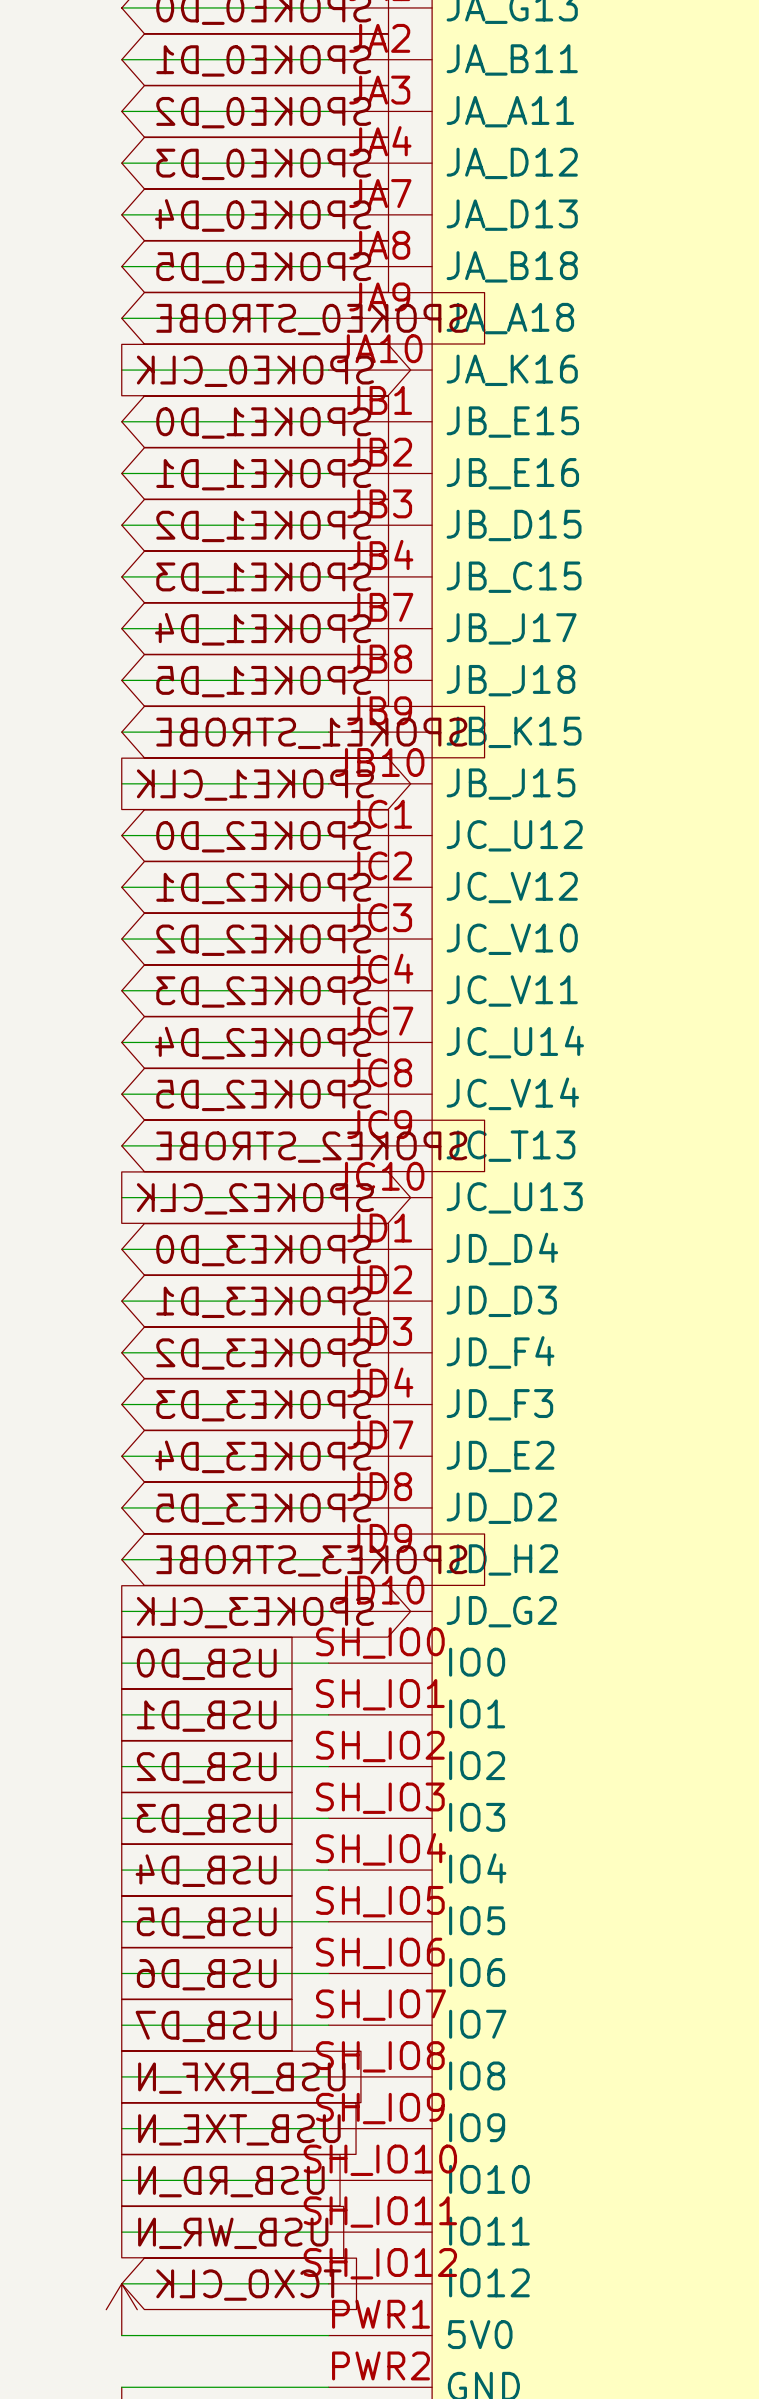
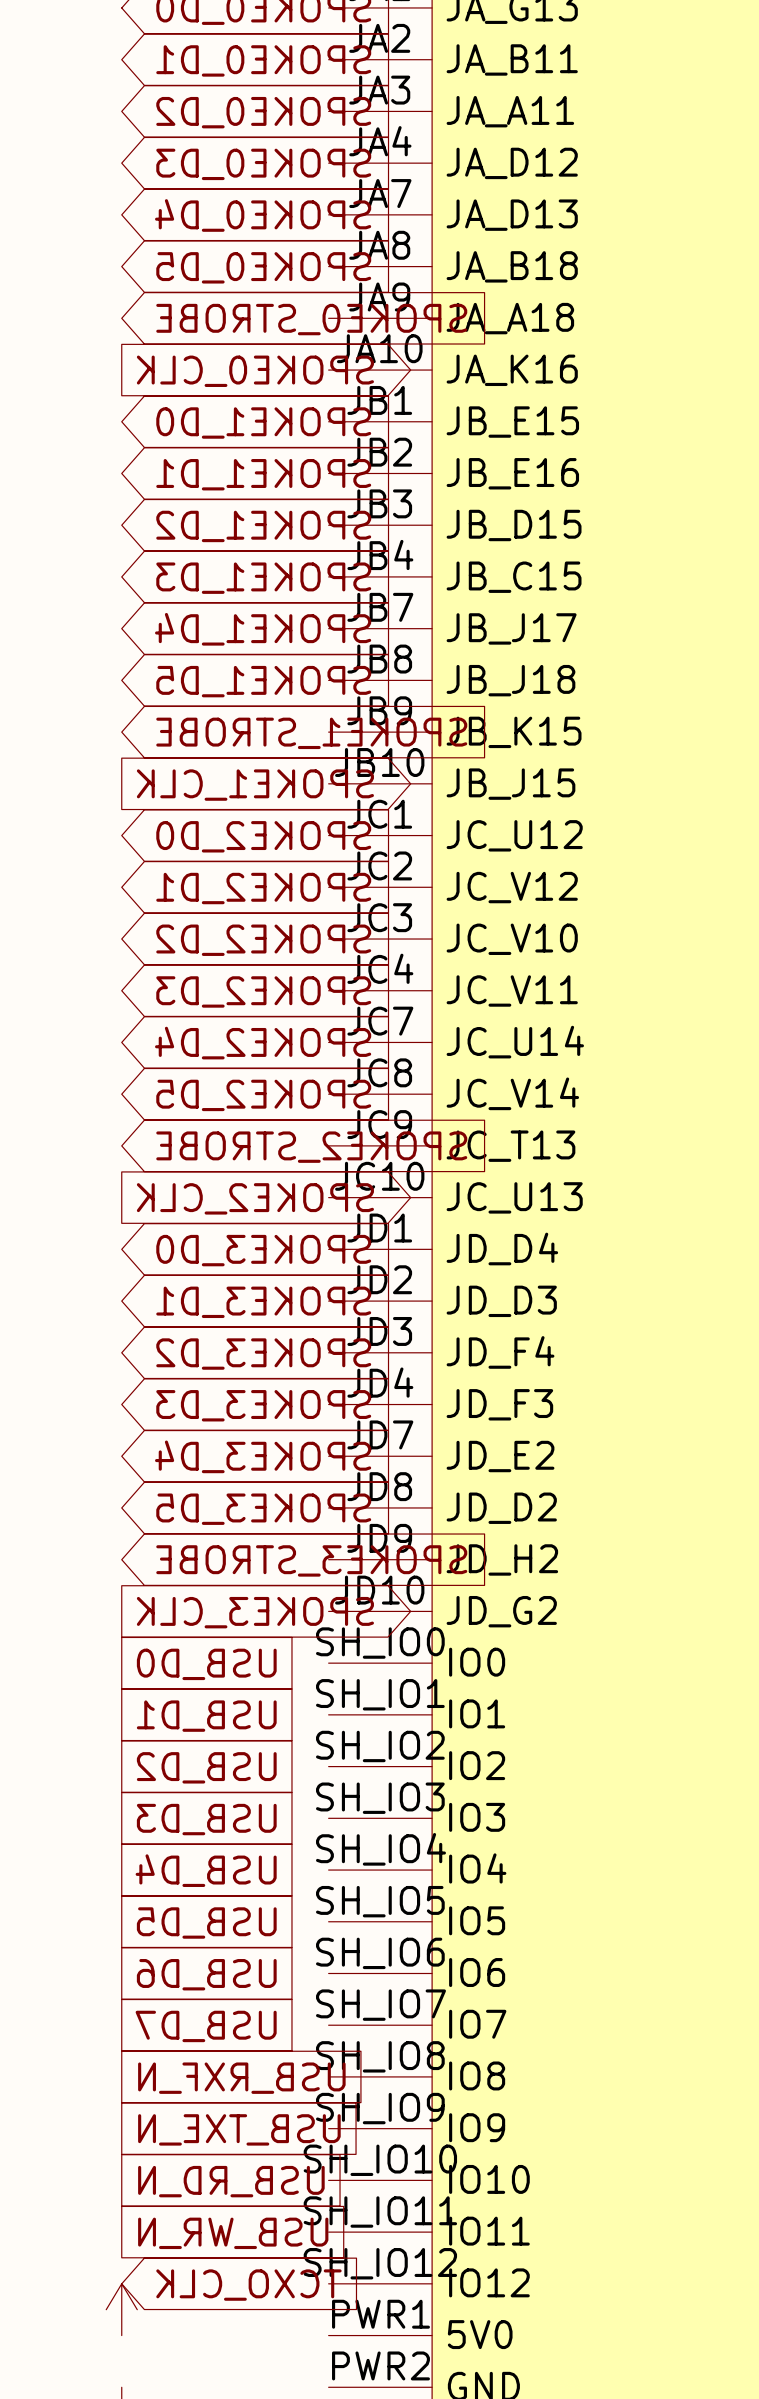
wire: (121, 7) (328, 7) -> none
wire: (121, 59) (328, 59) -> none
wire: (121, 111) (328, 111) -> none
wire: (121, 163) (328, 163) -> none
wire: (121, 214) (328, 214) -> none
wire: (121, 266) (328, 266) -> none
wire: (121, 318) (328, 318) -> none
wire: (121, 370) (328, 370) -> none
wire: (121, 421) (328, 421) -> none
wire: (121, 473) (328, 473) -> none
wire: (121, 525) (328, 525) -> none
wire: (121, 576) (328, 576) -> none
wire: (121, 628) (328, 628) -> none
wire: (121, 680) (328, 680) -> none
wire: (121, 732) (328, 732) -> none
wire: (121, 783) (328, 783) -> none
wire: (121, 835) (328, 835) -> none
wire: (121, 887) (328, 887) -> none
wire: (121, 939) (328, 939) -> none
wire: (121, 990) (328, 990) -> none
wire: (121, 1042) (328, 1042) -> none
wire: (121, 1094) (328, 1094) -> none
wire: (121, 1145) (328, 1145) -> none
wire: (121, 1197) (328, 1197) -> none
wire: (121, 1249) (328, 1249) -> none
wire: (121, 1301) (328, 1301) -> none
wire: (121, 1352) (328, 1352) -> none
wire: (121, 1404) (328, 1404) -> none
wire: (121, 1456) (328, 1456) -> none
wire: (121, 1507) (328, 1507) -> none
wire: (121, 1559) (328, 1559) -> none
wire: (121, 1611) (328, 1611) -> none
wire: (121, 1663) (328, 1663) -> none
wire: (121, 1714) (328, 1714) -> none
wire: (121, 1766) (328, 1766) -> none
wire: (121, 1818) (328, 1818) -> none
wire: (121, 1870) (328, 1870) -> none
wire: (121, 1921) (328, 1921) -> none
wire: (121, 1973) (328, 1973) -> none
wire: (121, 2025) (328, 2025) -> none
wire: (121, 2076) (328, 2076) -> none
wire: (121, 2128) (328, 2128) -> none
wire: (121, 2180) (328, 2180) -> none
wire: (121, 2232) (328, 2232) -> none
wire: (121, 2283) (328, 2283) -> none
wire: (121, 2335) (328, 2335) -> none
wire: (121, 2387) (328, 2387) -> none

